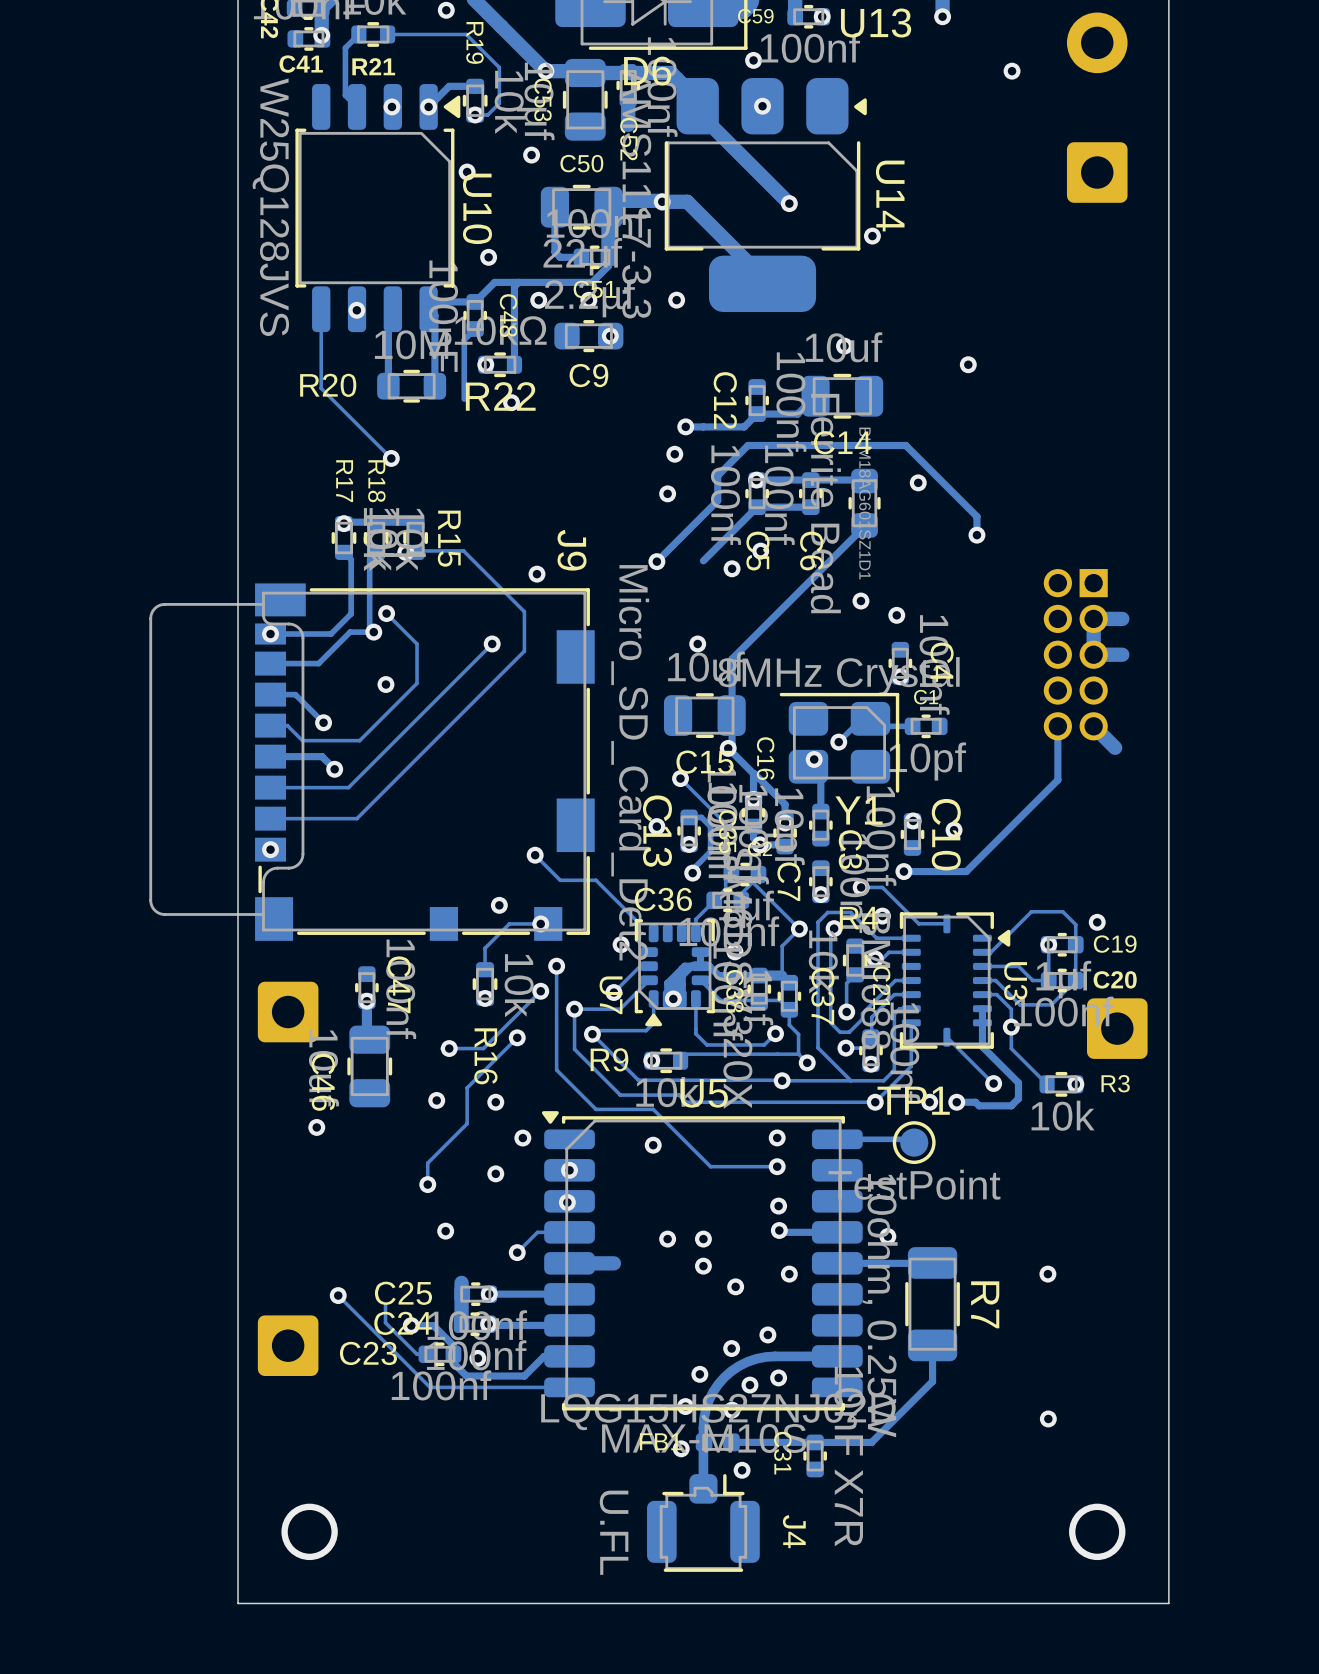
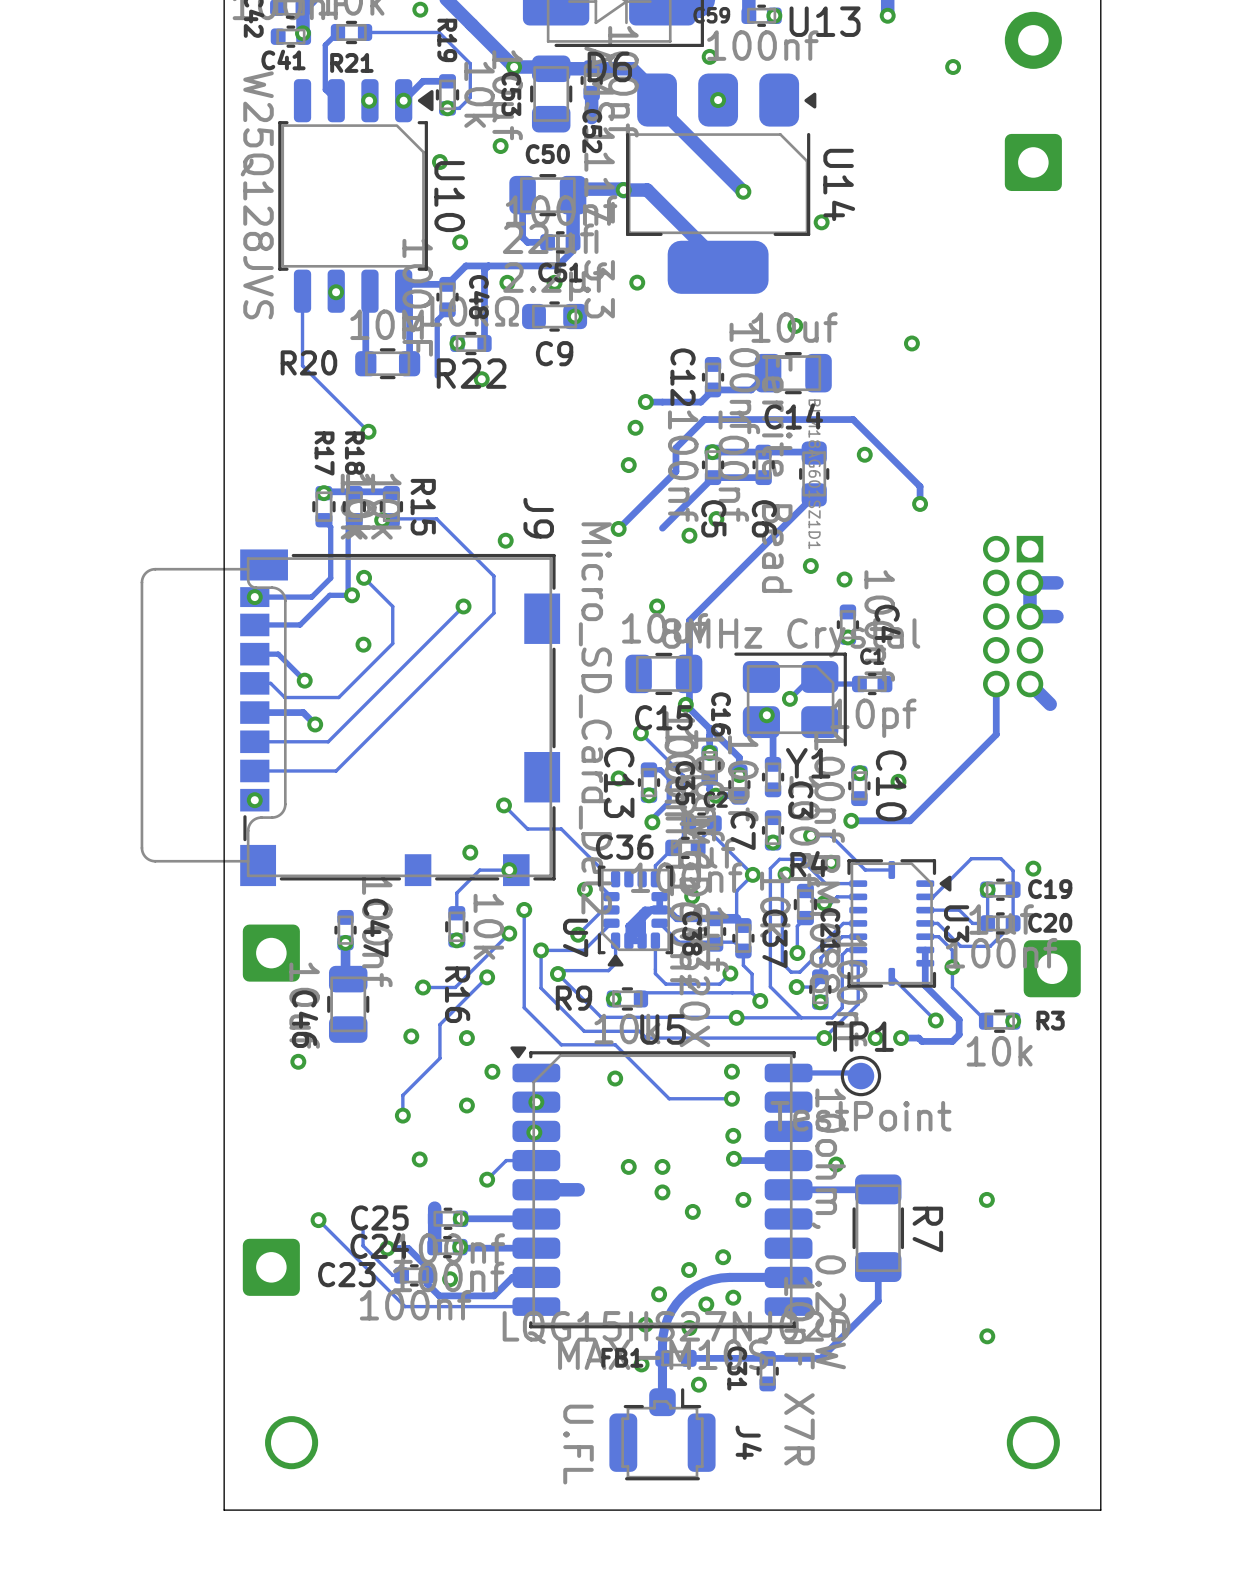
via: (673, 998) -> none

